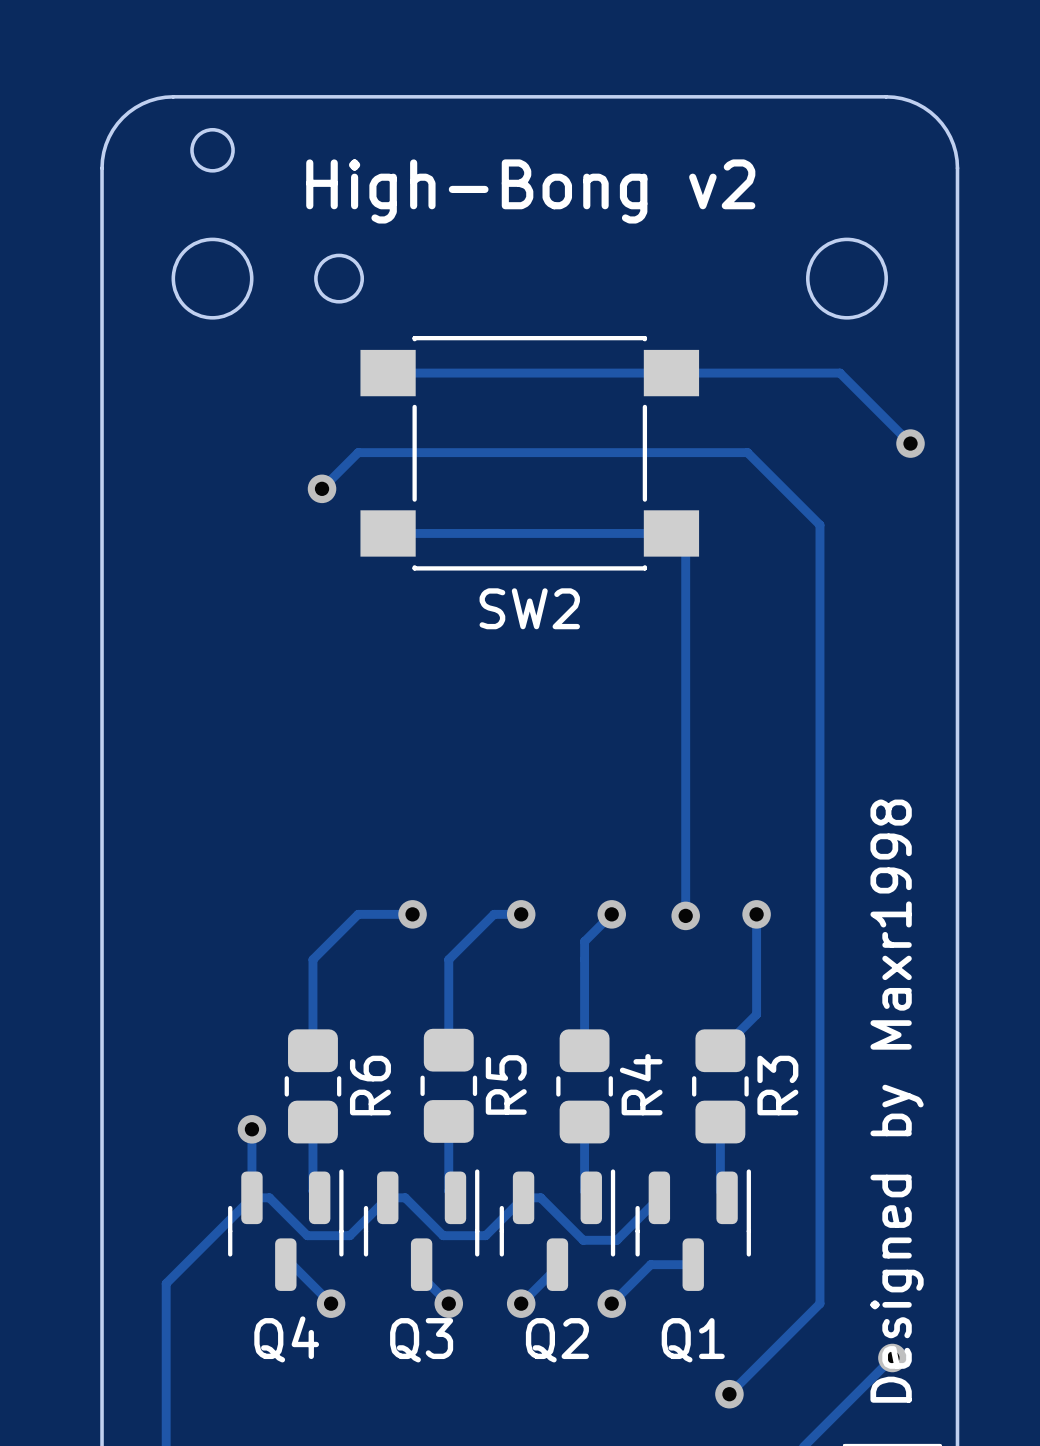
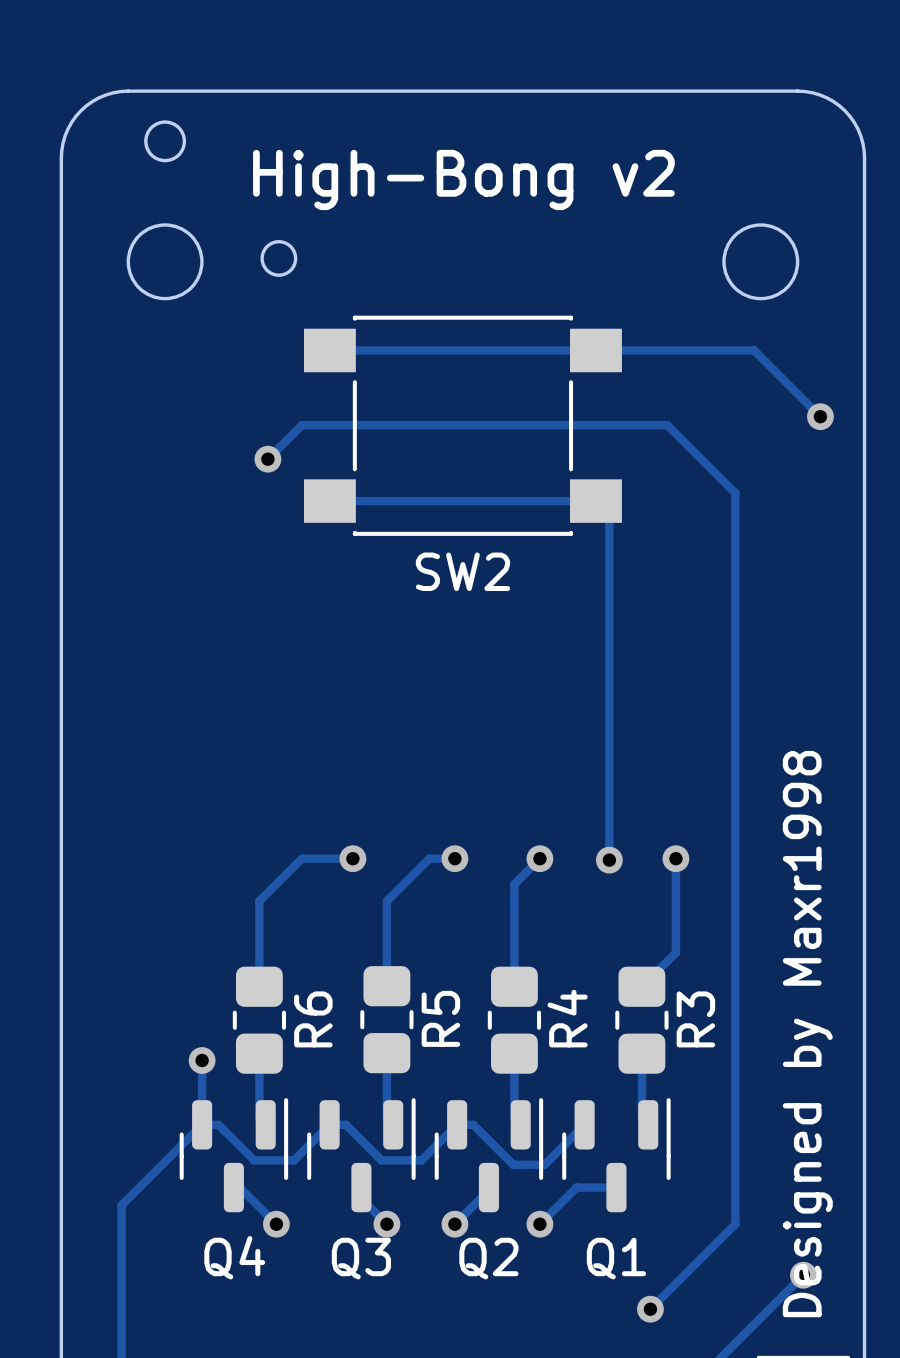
round board edge size: [314, 253, 365, 304] -> [260, 240, 298, 277]

